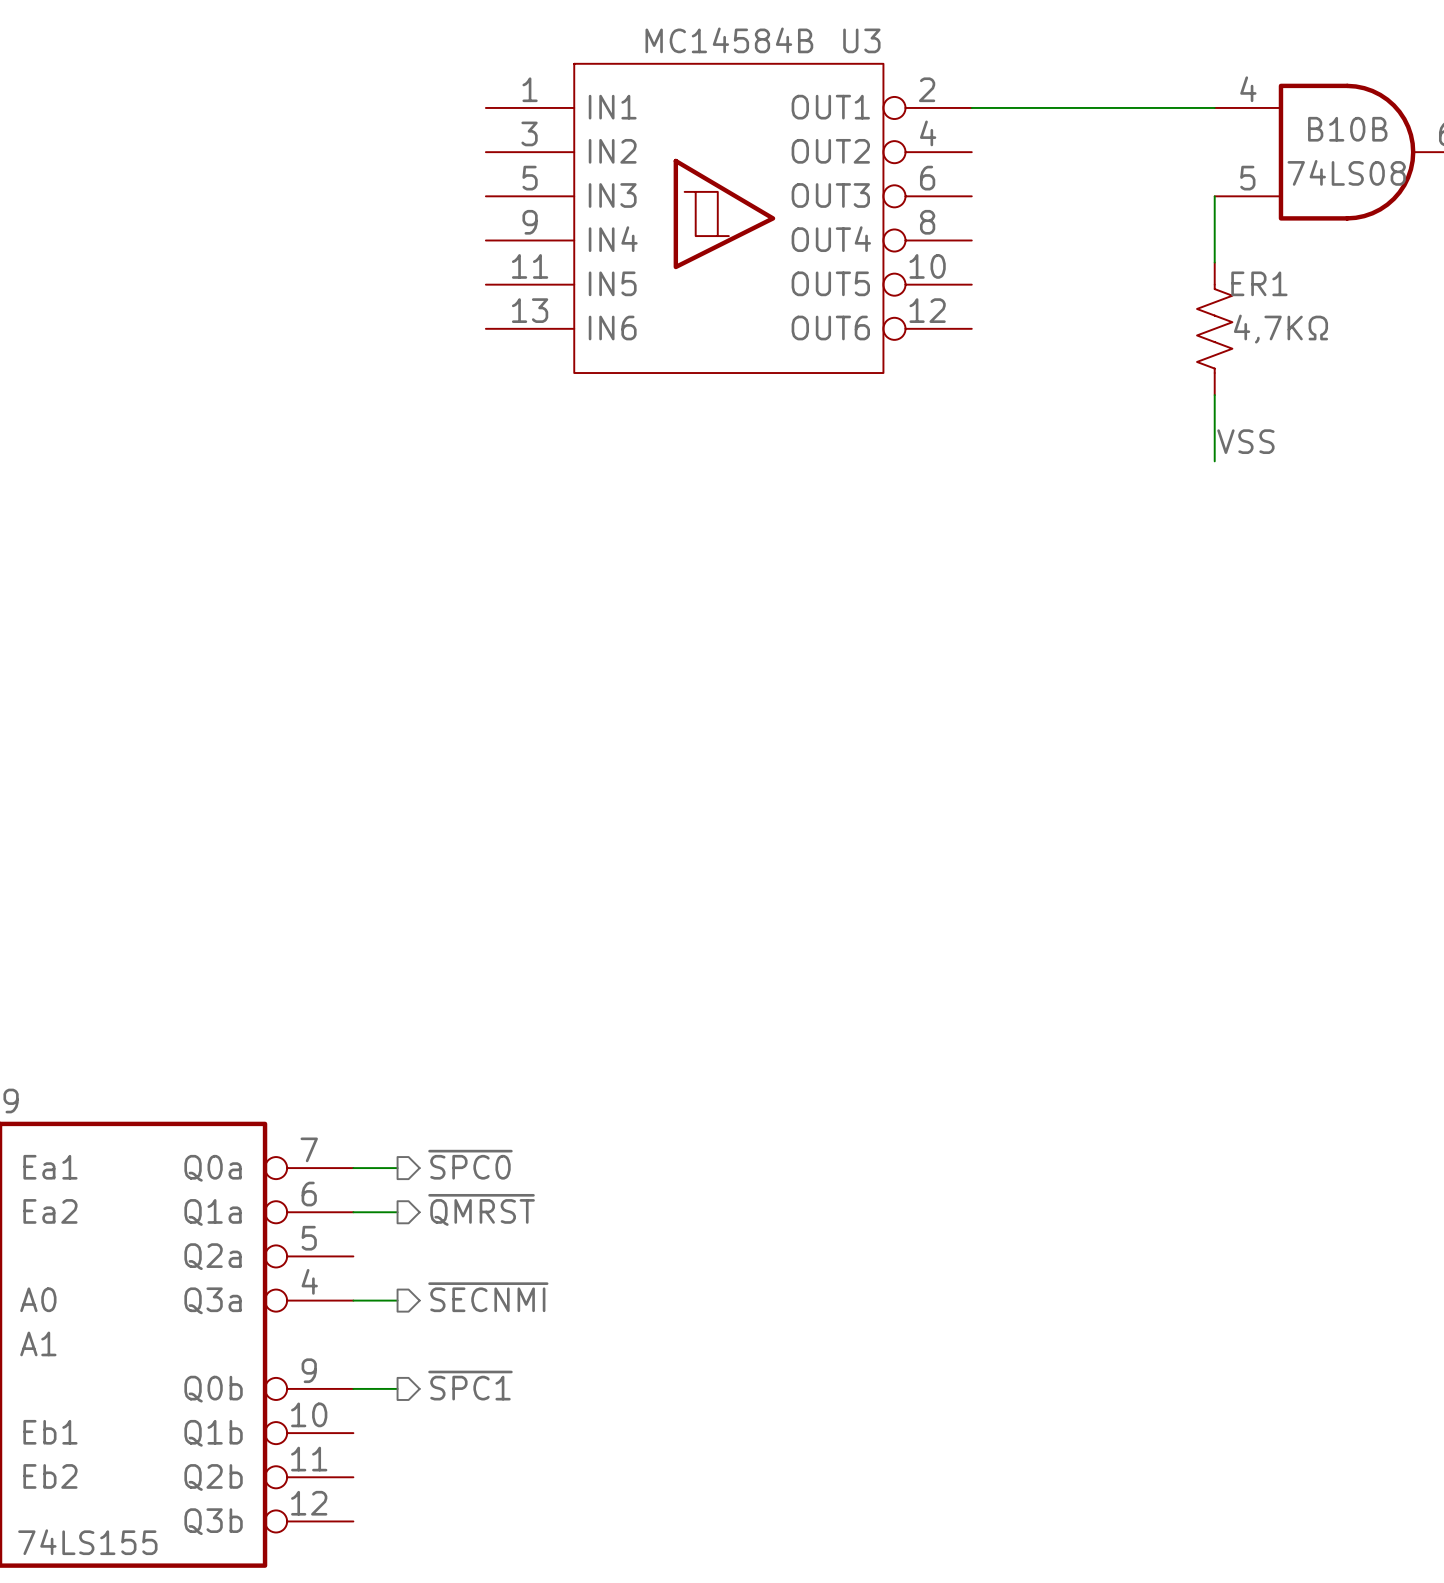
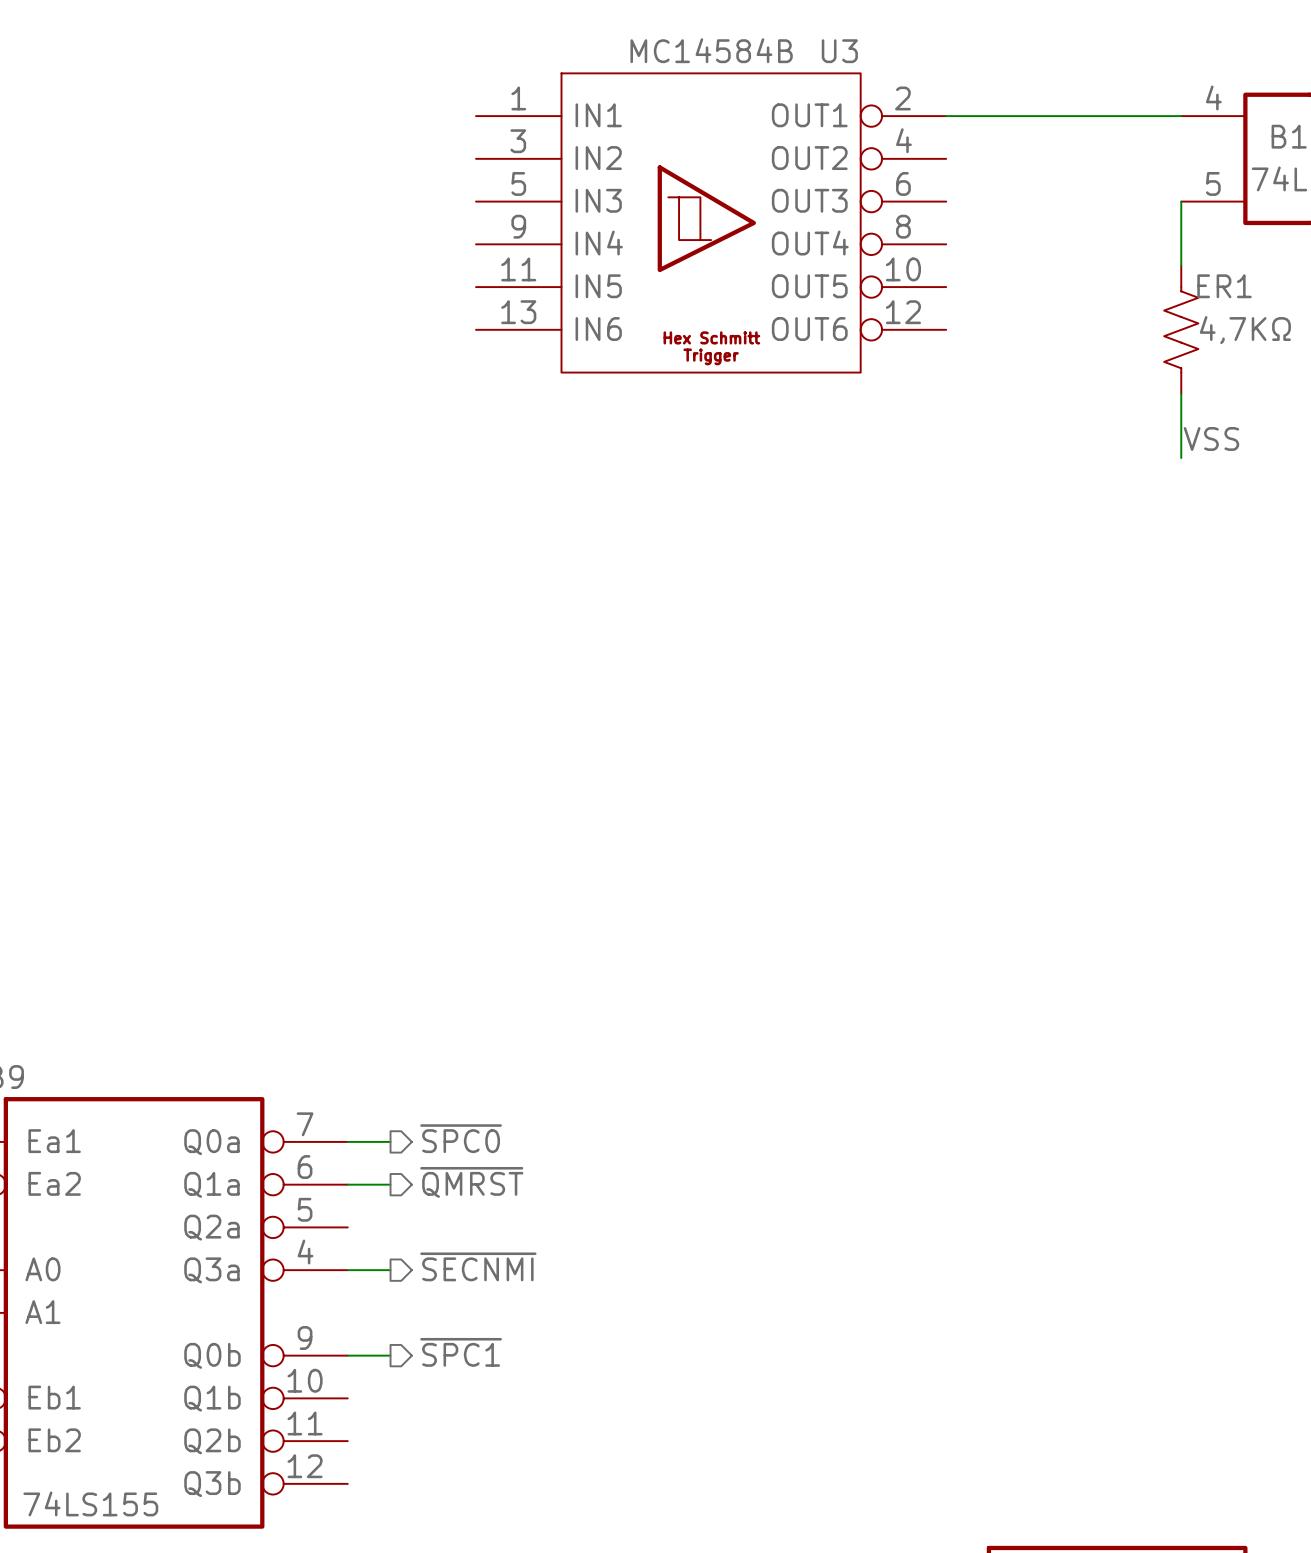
U3 text: none -> Hex Schmitt (711, 337)
U3 text: none -> Trigger (711, 356)

